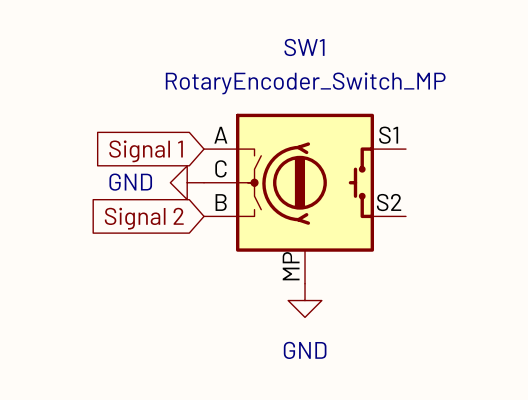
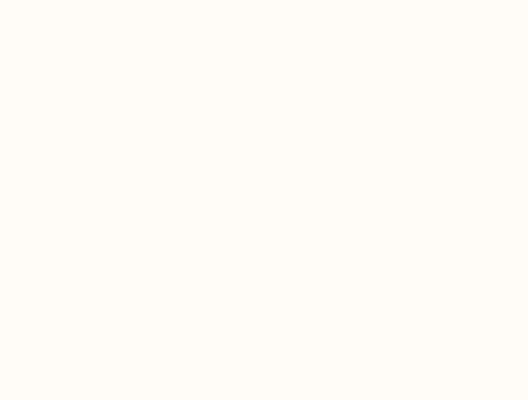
global label: Signal 1 (146, 151) -> none
power symbol: GND (187, 182) -> none
SW1: RotaryEncoder_Switch_MP (305, 198) -> none
global label: Signal 2 (144, 218) -> none
power symbol: GND (305, 300) -> none

